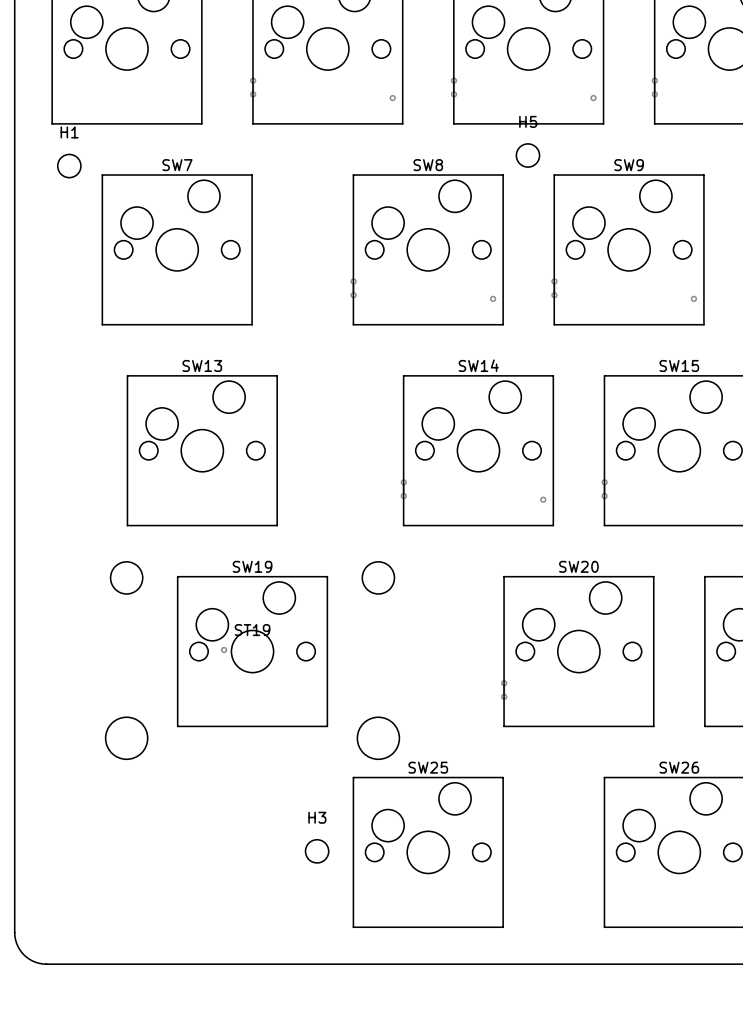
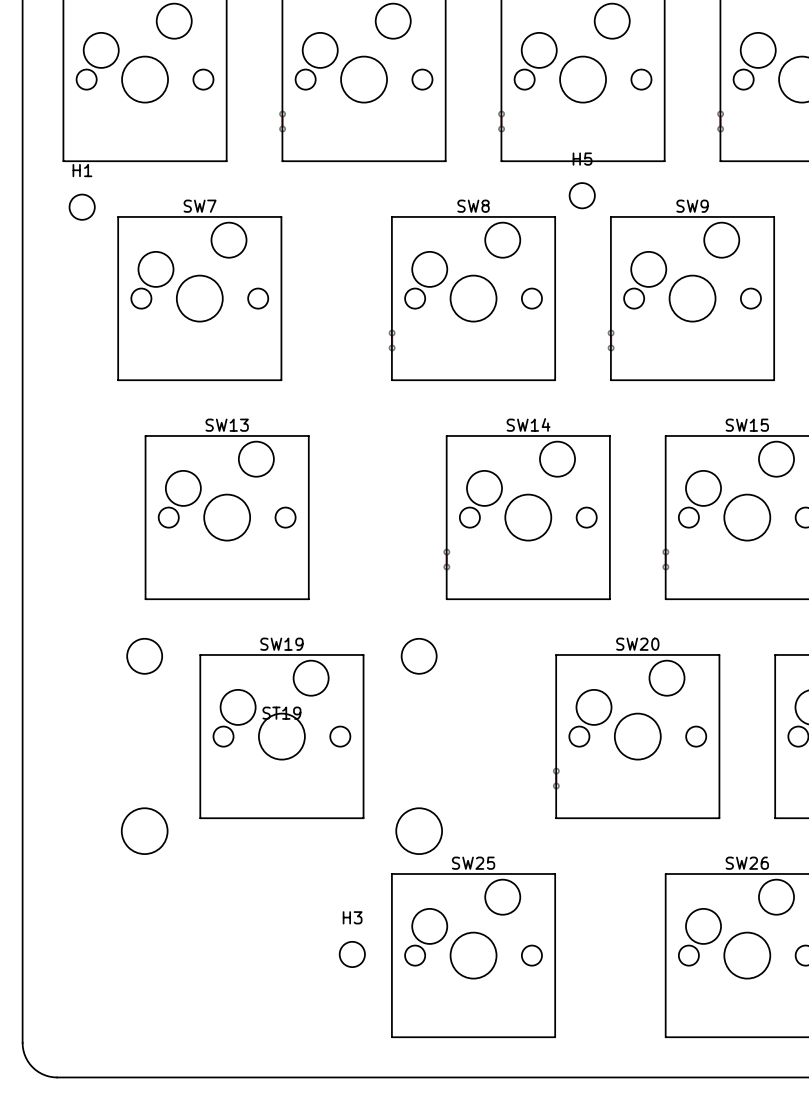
via: (392, 98) -> none
via: (593, 98) -> none
via: (493, 298) -> none
via: (693, 298) -> none
via: (543, 499) -> none
via: (224, 650) -> none

